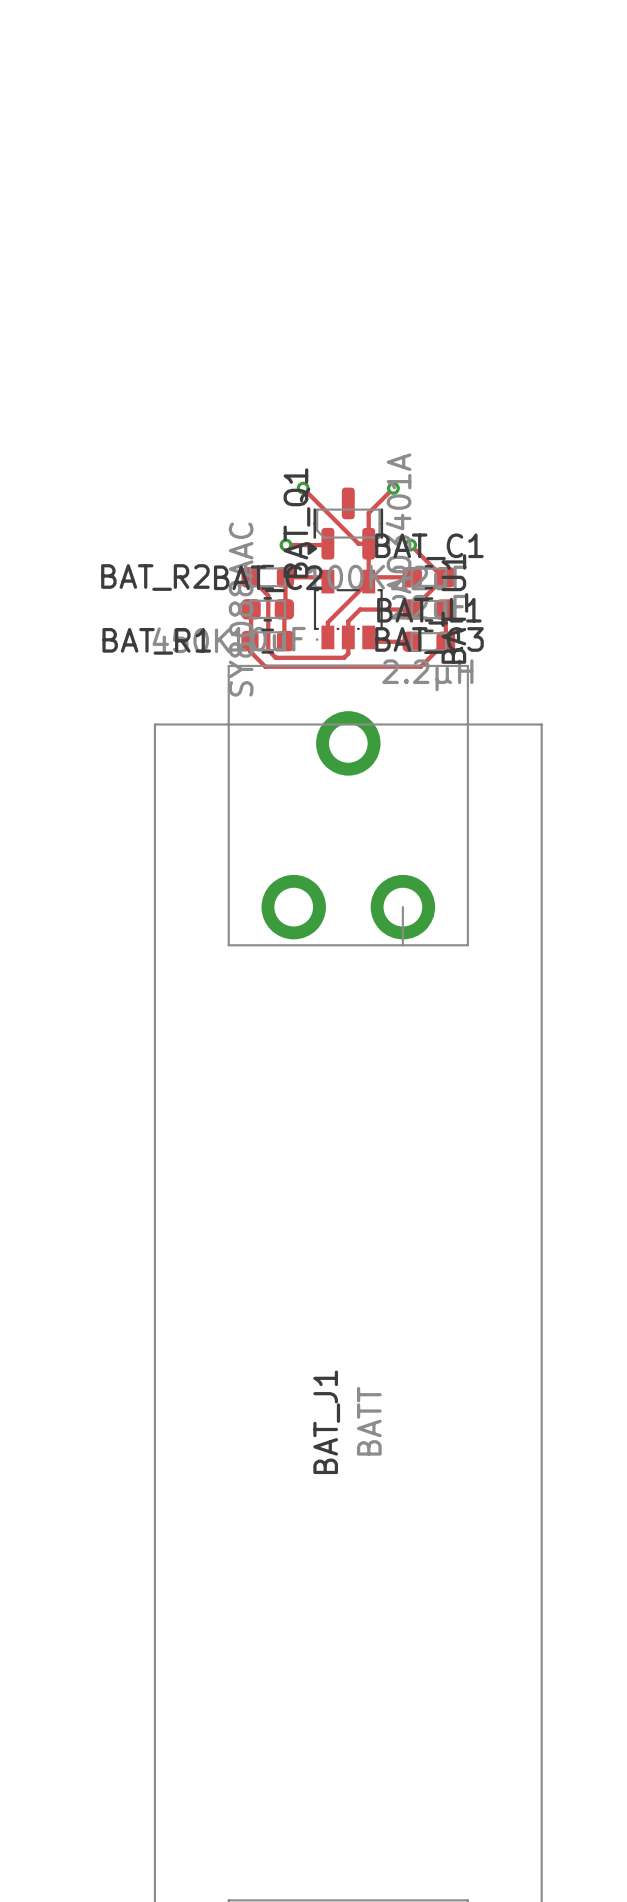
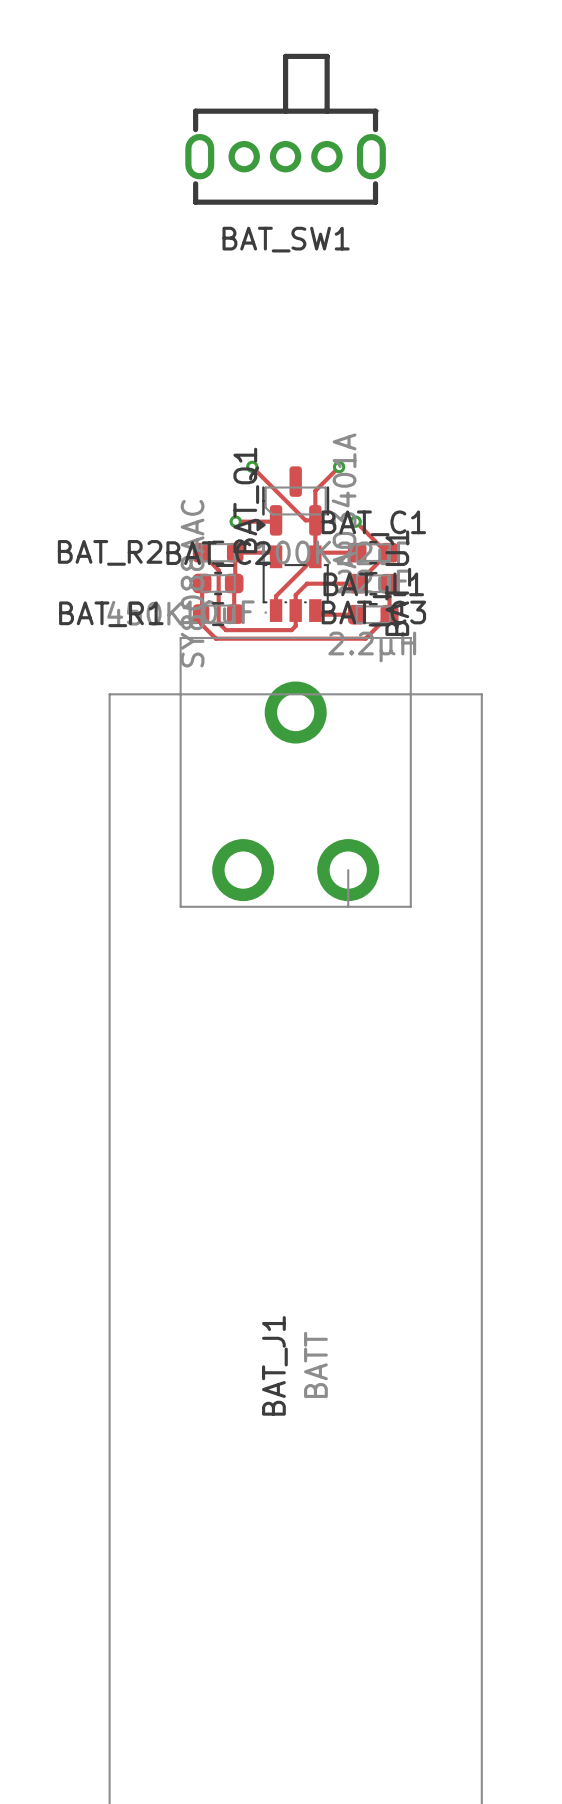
BAT_SW1: none -> (285, 129)

